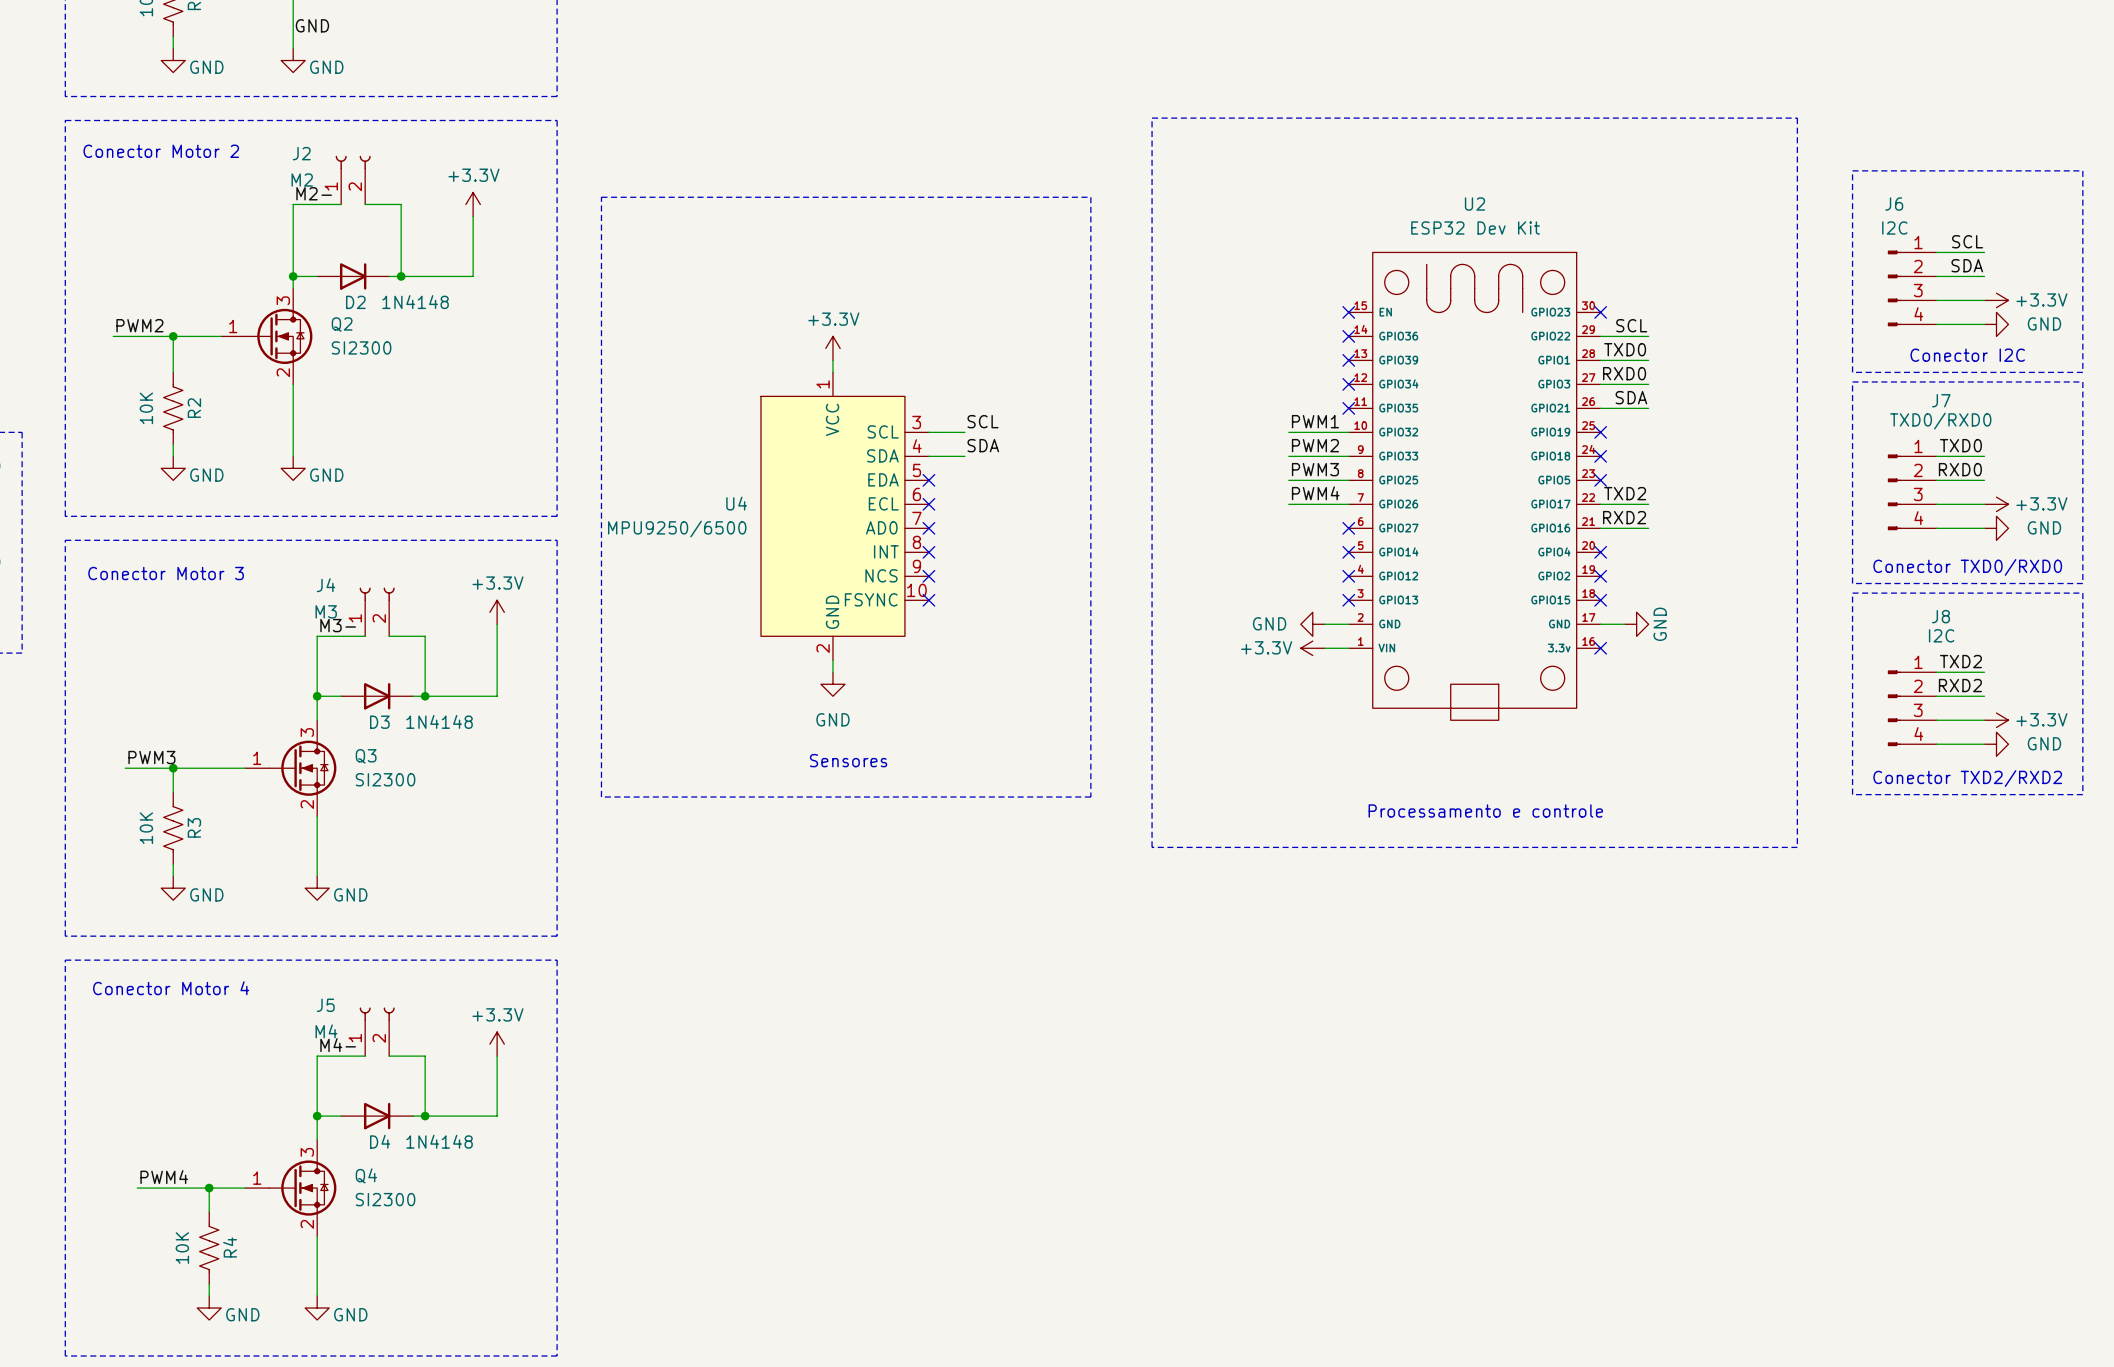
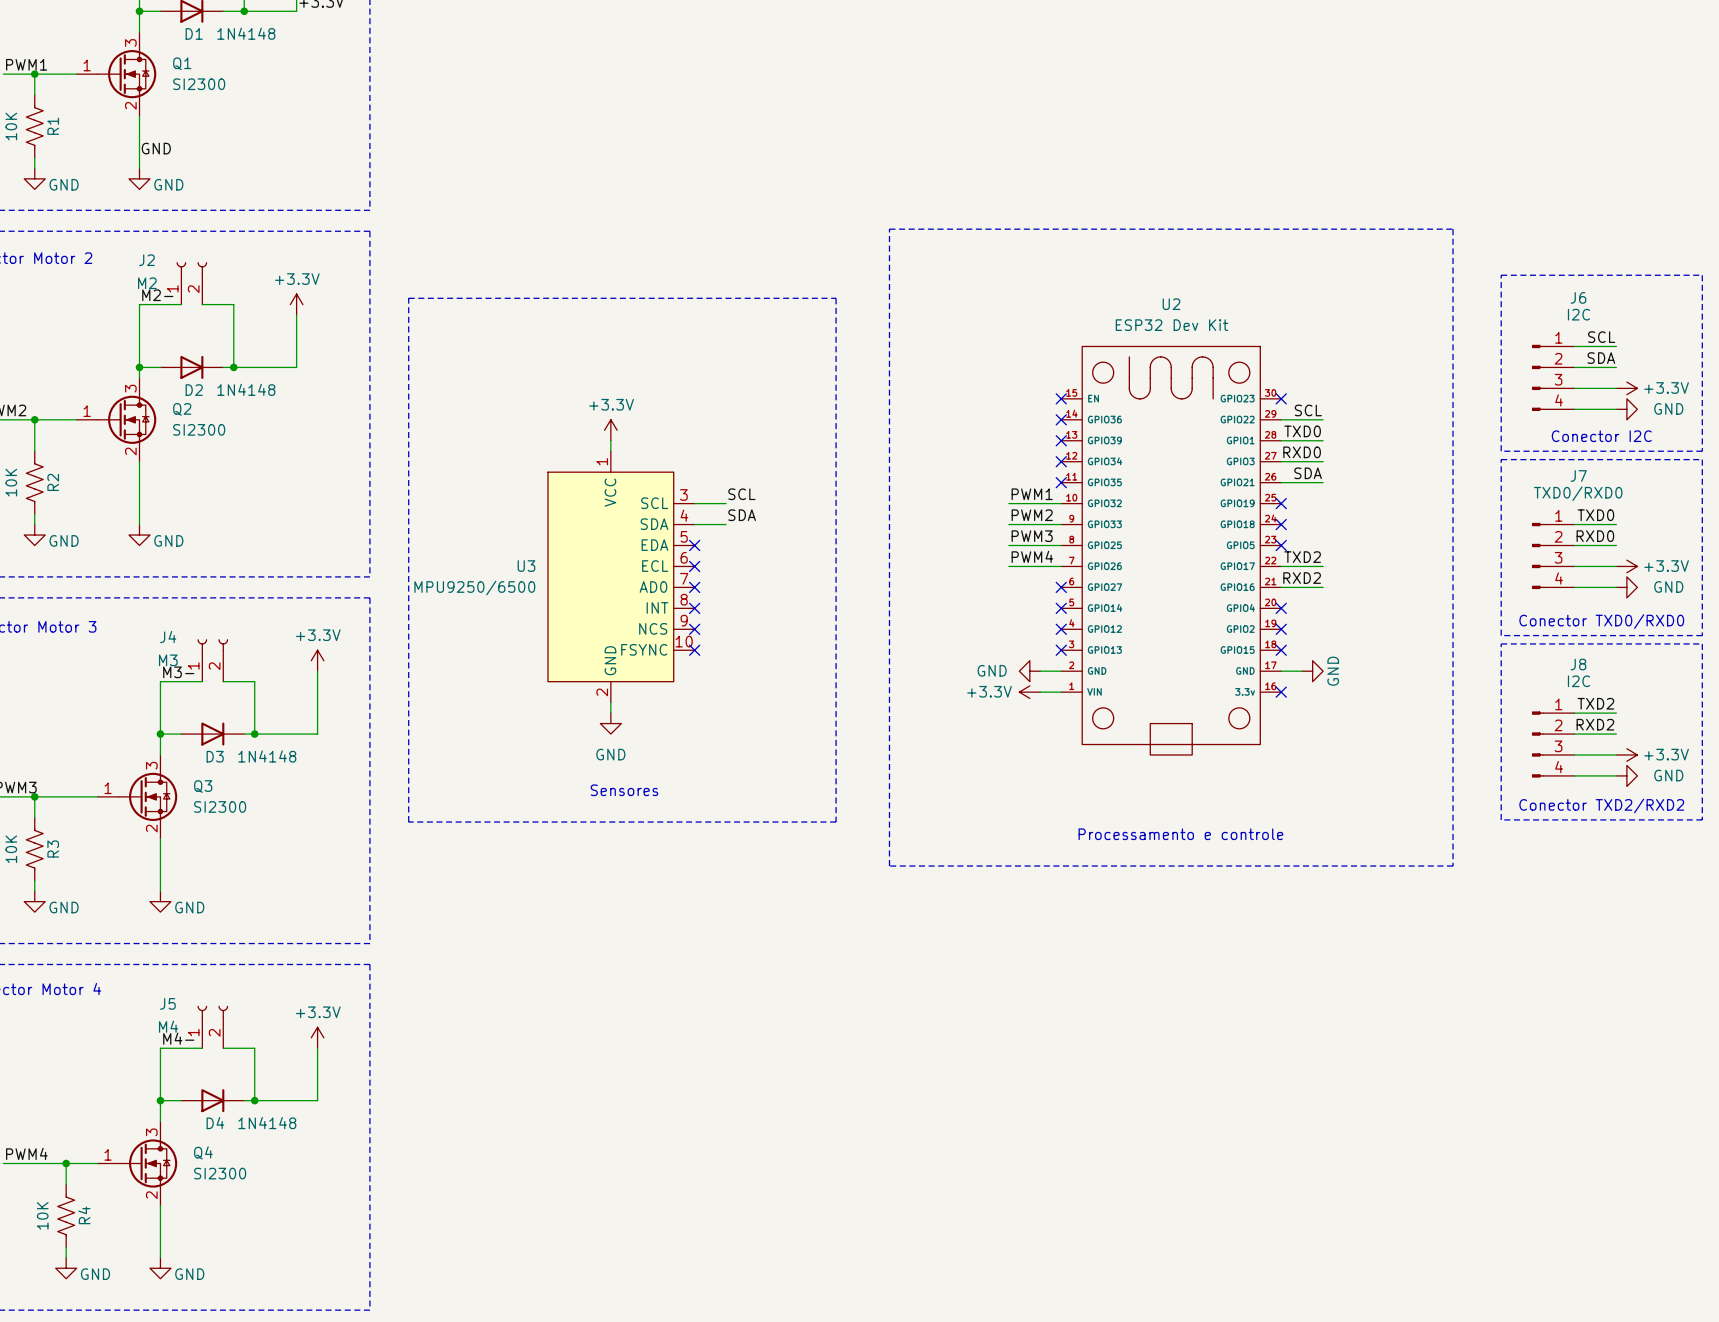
J6 name position: J6 (1894, 204) -> J6 (1578, 297)
J6 value position: I2C (1894, 228) -> I2C (1578, 314)
U4 name: U4 (736, 503) -> U3 (526, 566)

